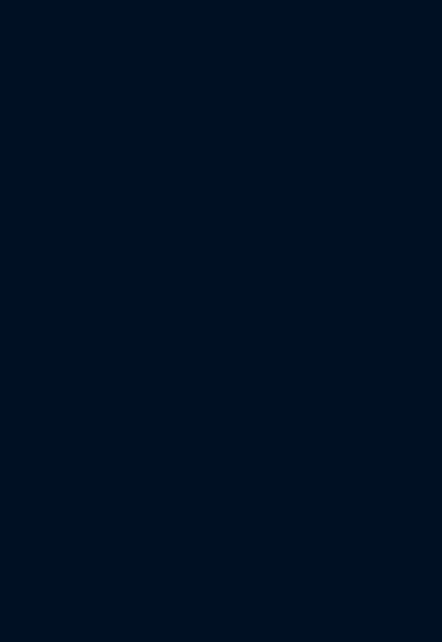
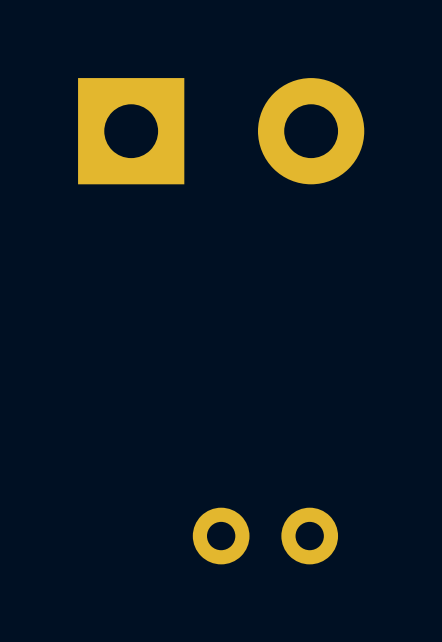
part: none -> (221, 131)
part: none -> (265, 536)

